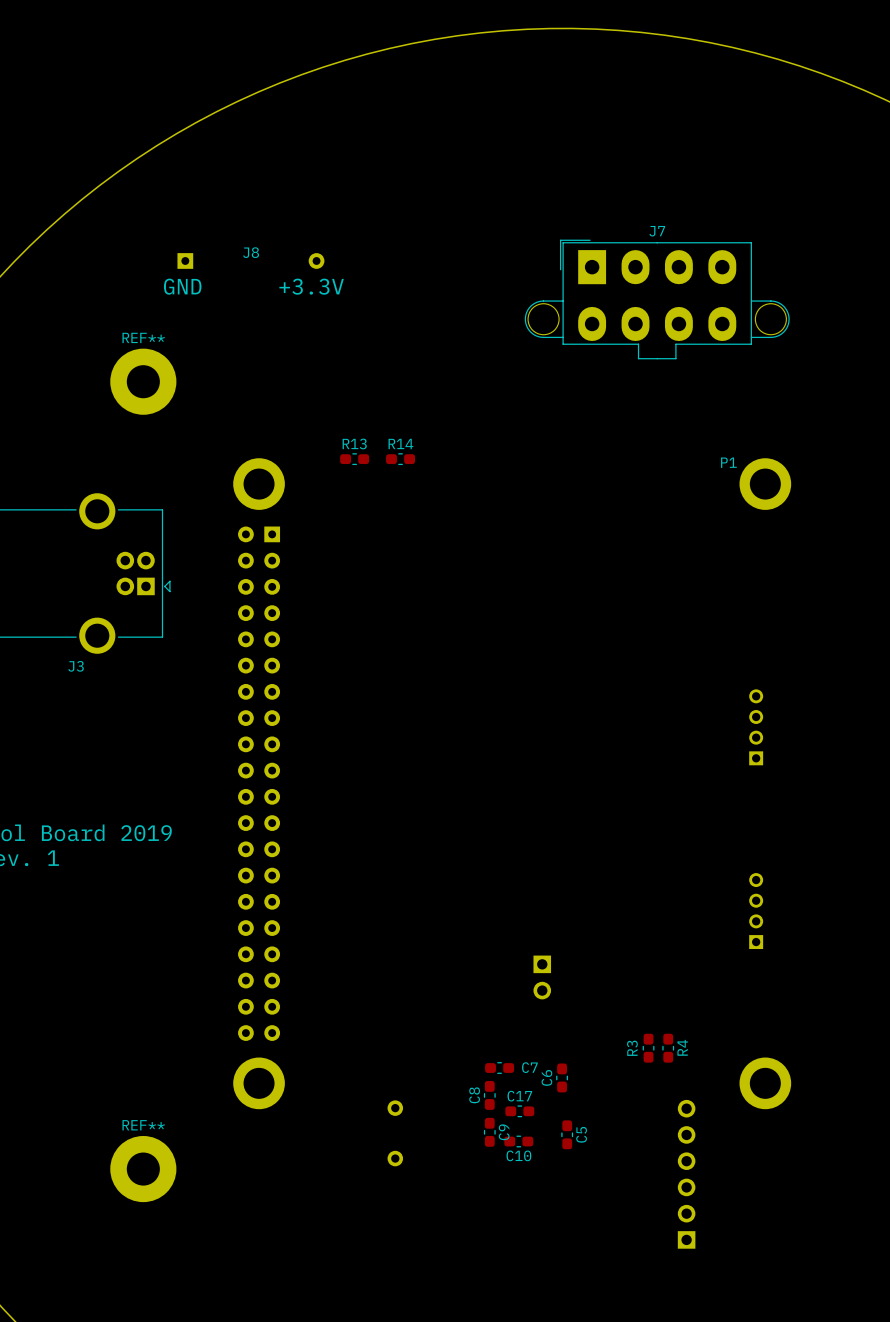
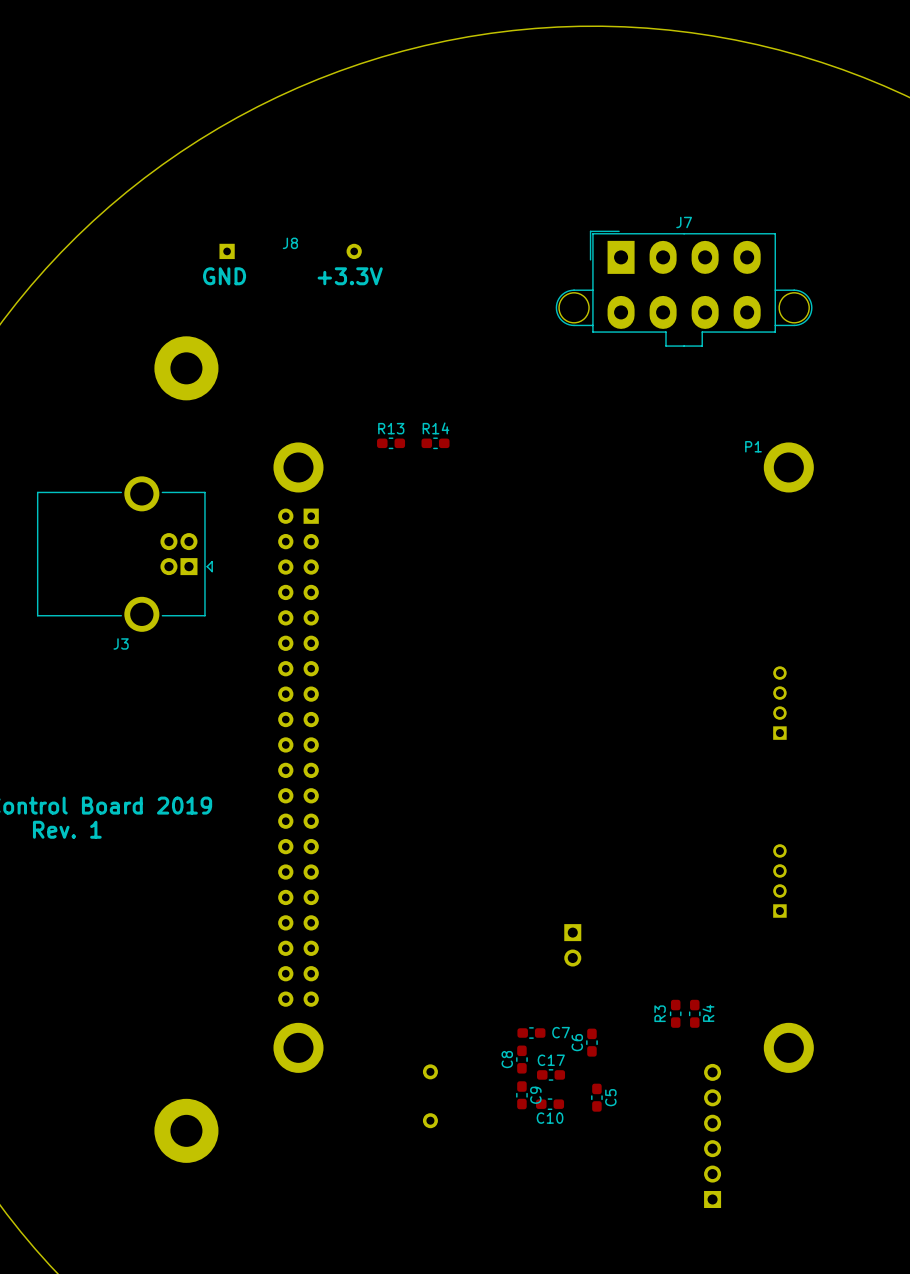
REF** name: REF** (143, 337) -> none
REF** name: REF** (143, 1125) -> none

